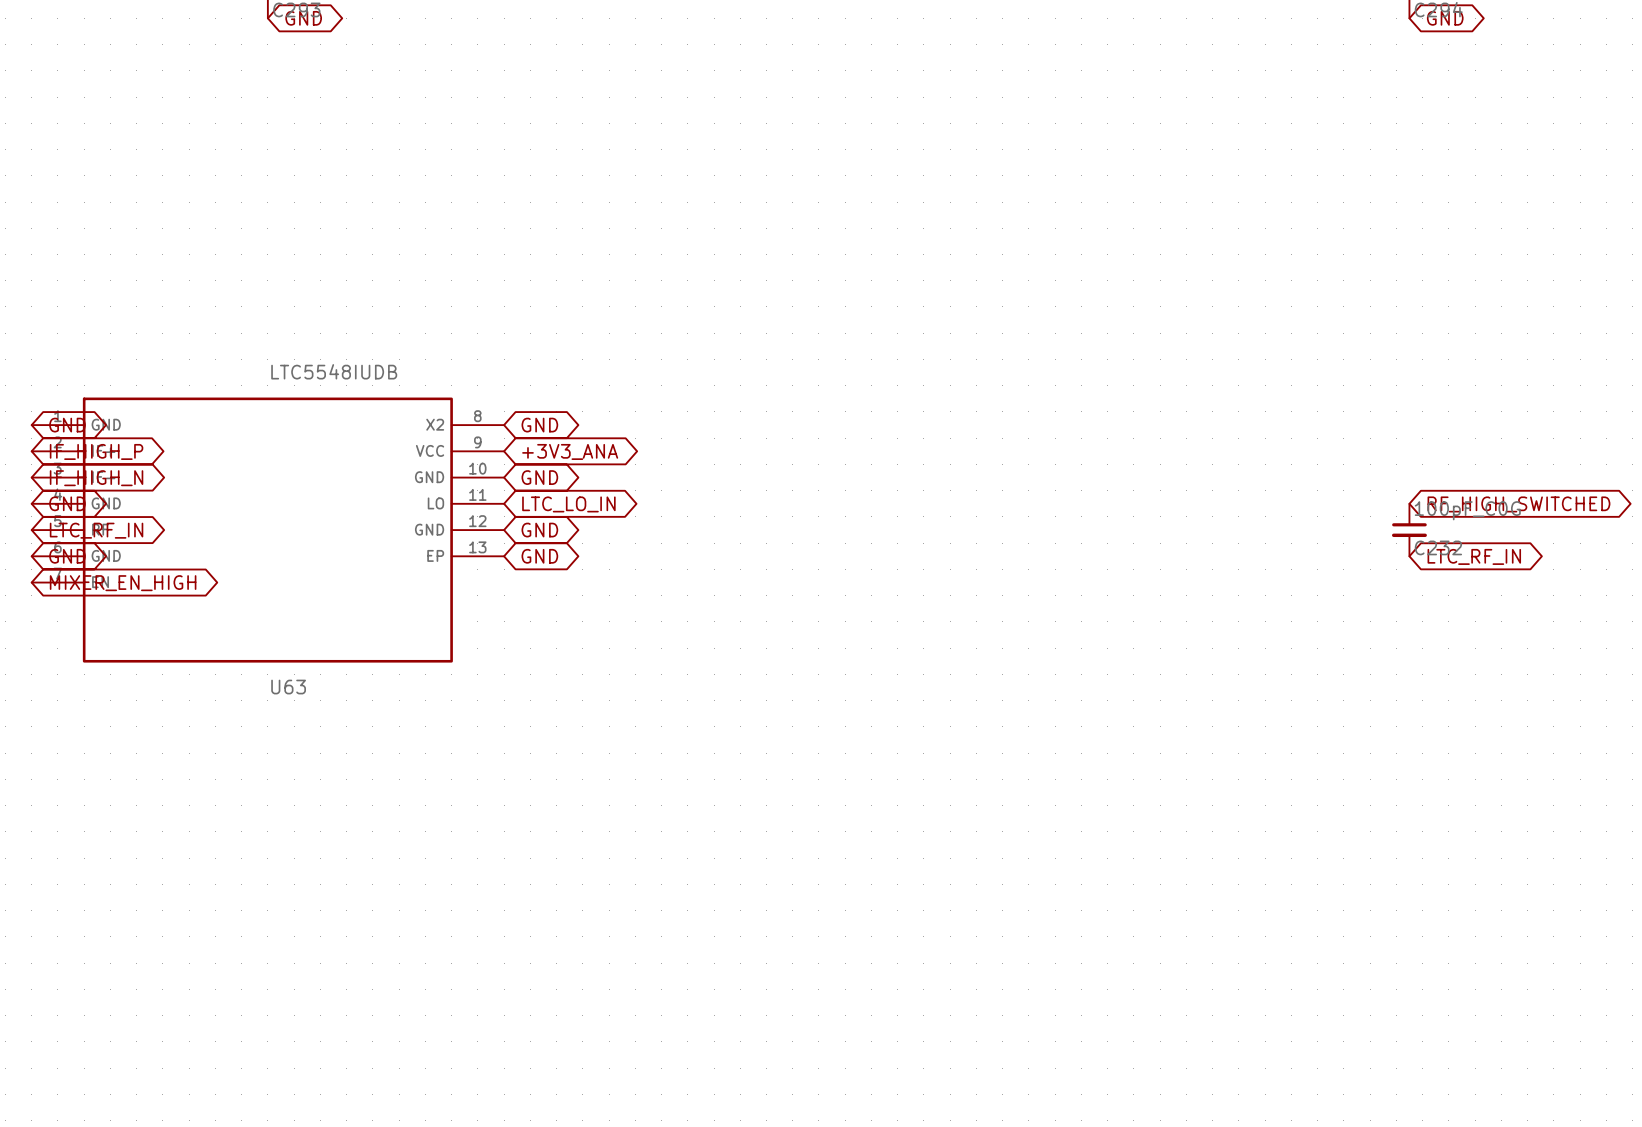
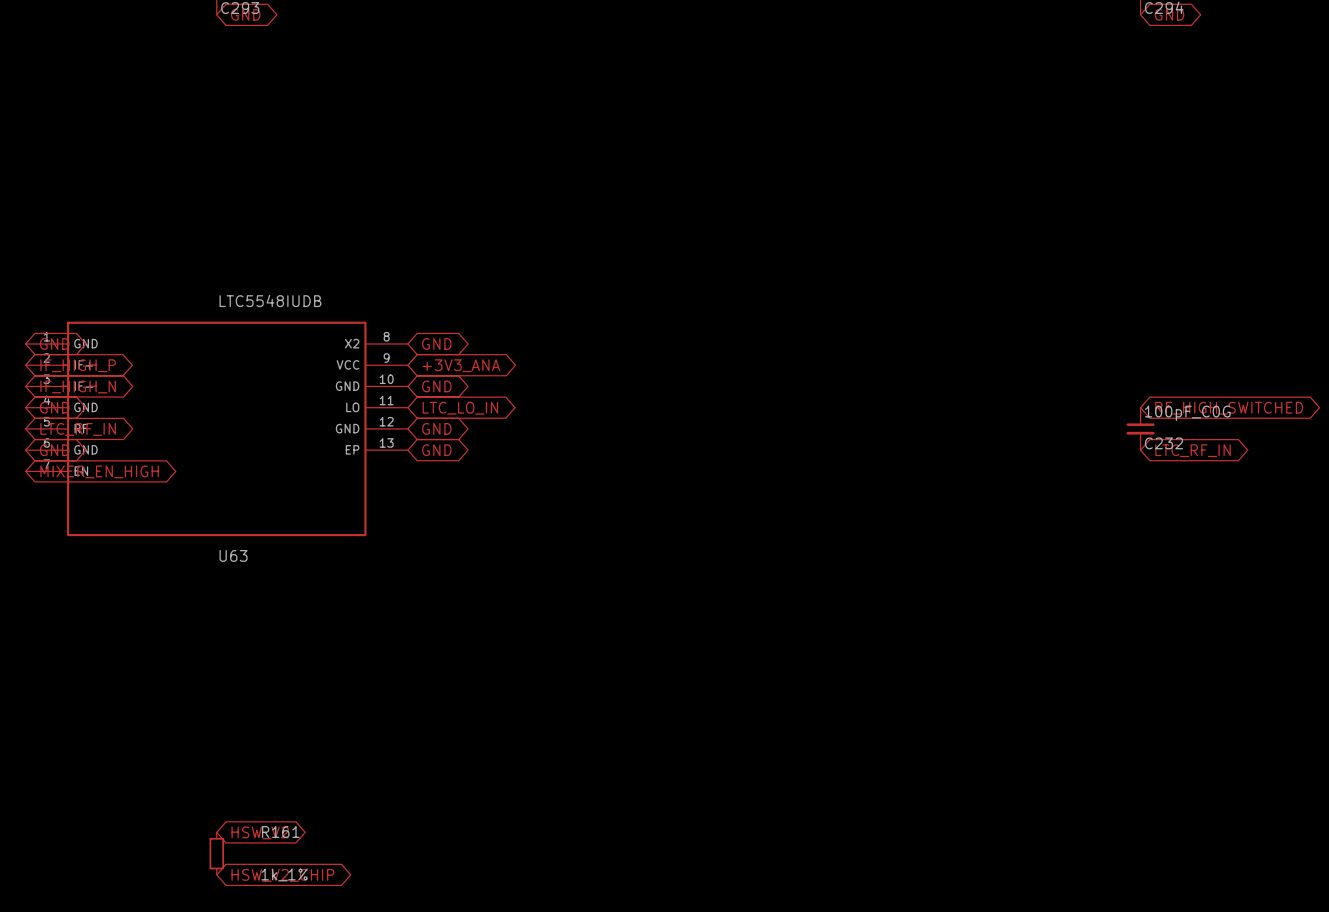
global label: none -> HSW_V2 (260, 832)
R161: none -> 1k_1% (216, 853)
global label: none -> HSW_V2_CHIP (282, 875)

